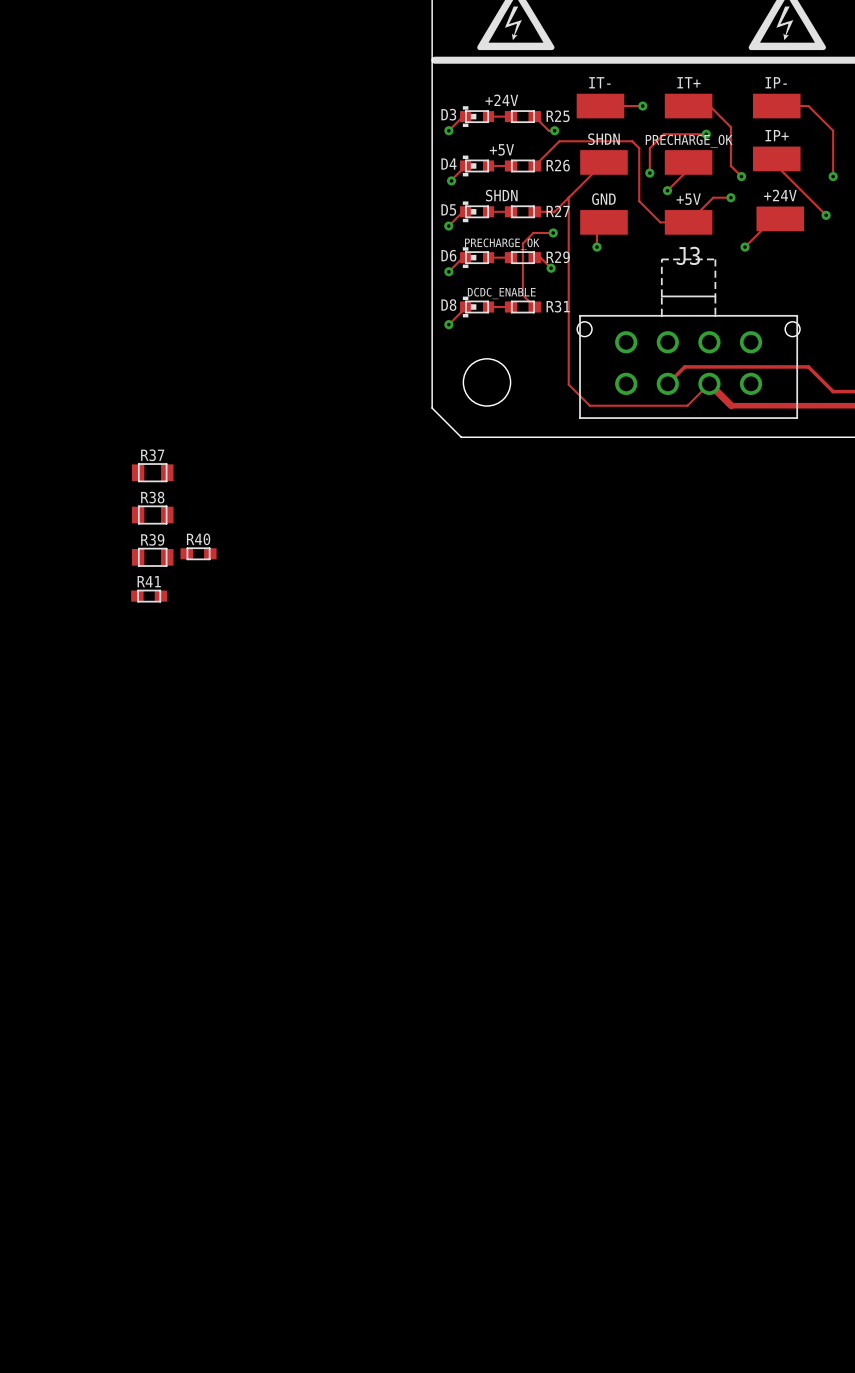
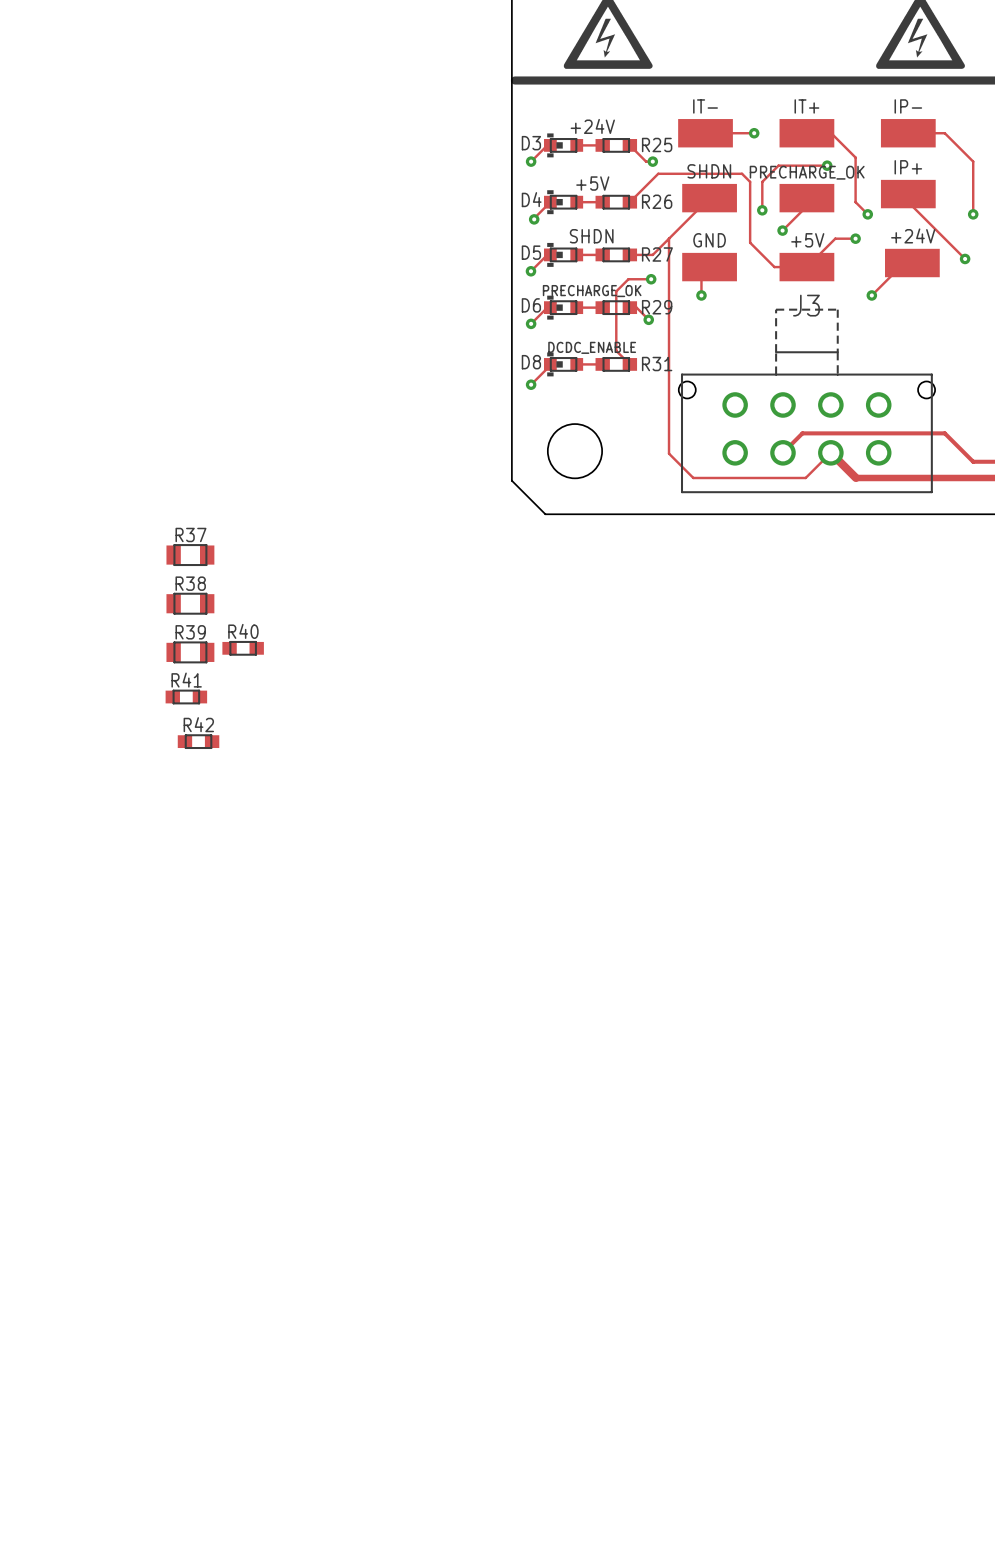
R42: none -> (198, 741)

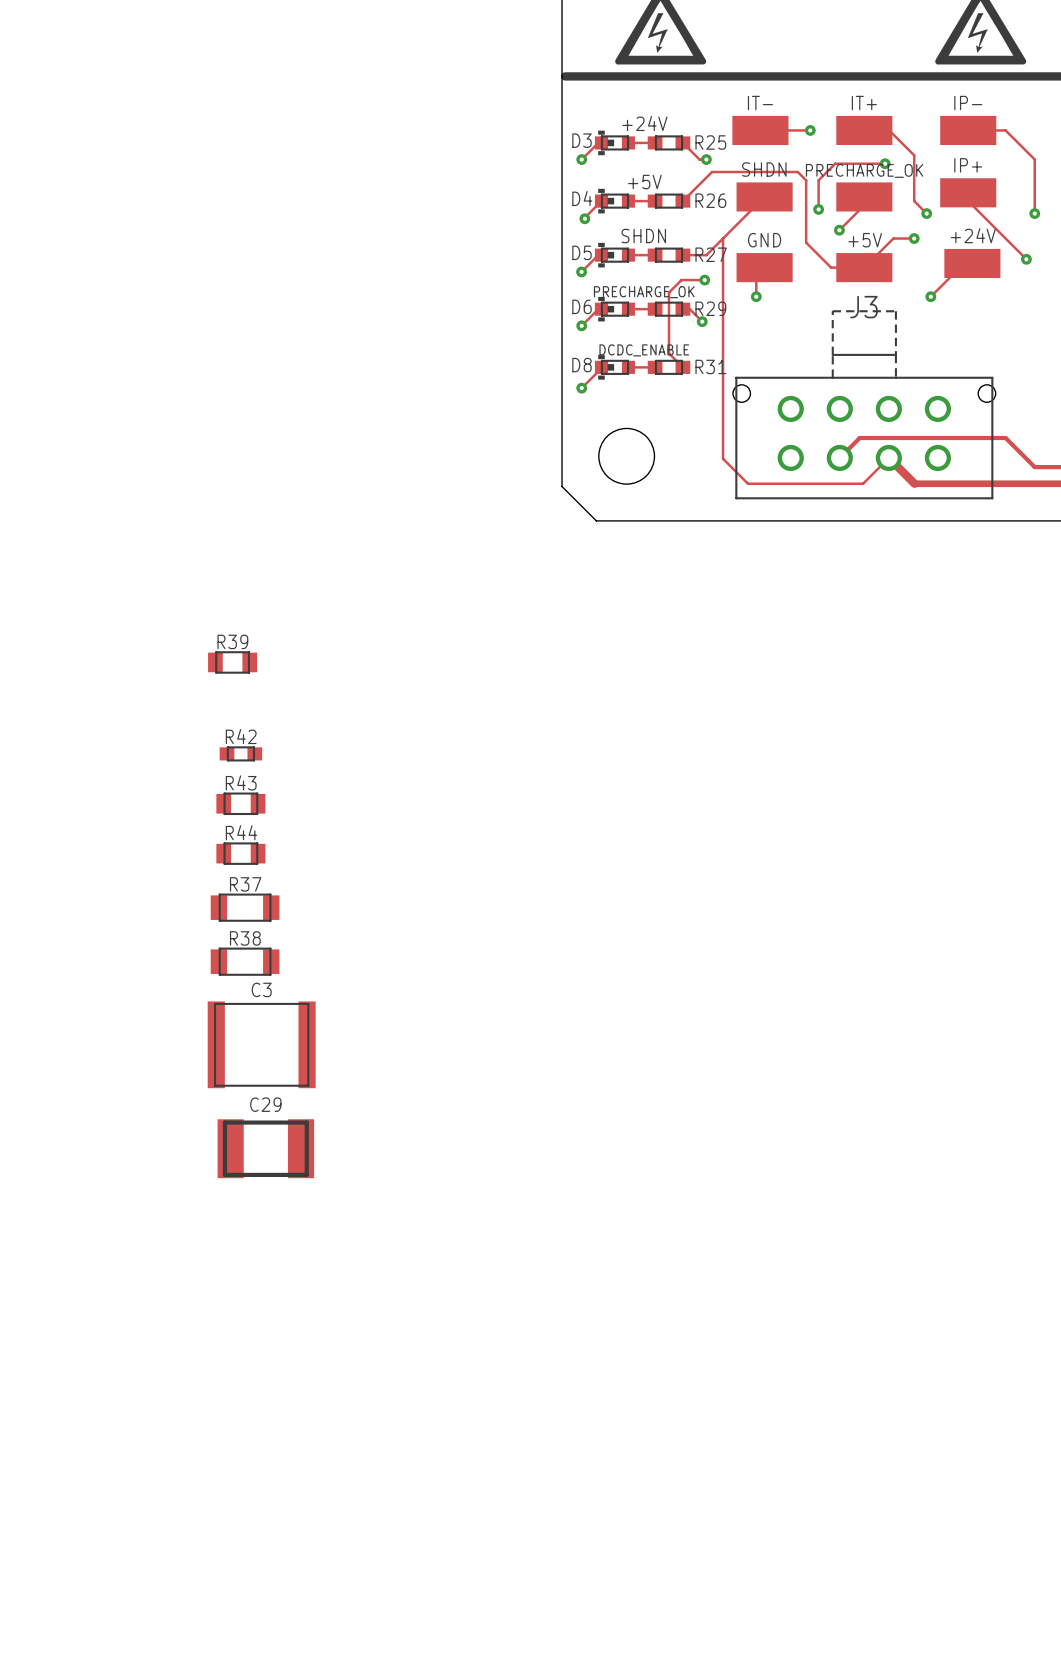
R37 footprint: [166, 544, 215, 567] -> [210, 893, 280, 922]
R38 footprint: [166, 592, 215, 615] -> [210, 947, 280, 976]
R40: (243, 648) -> none
R41: (186, 697) -> none
R43: none -> (240, 803)
R44: none -> (240, 853)
C3: none -> (261, 1044)
C29: none -> (265, 1148)

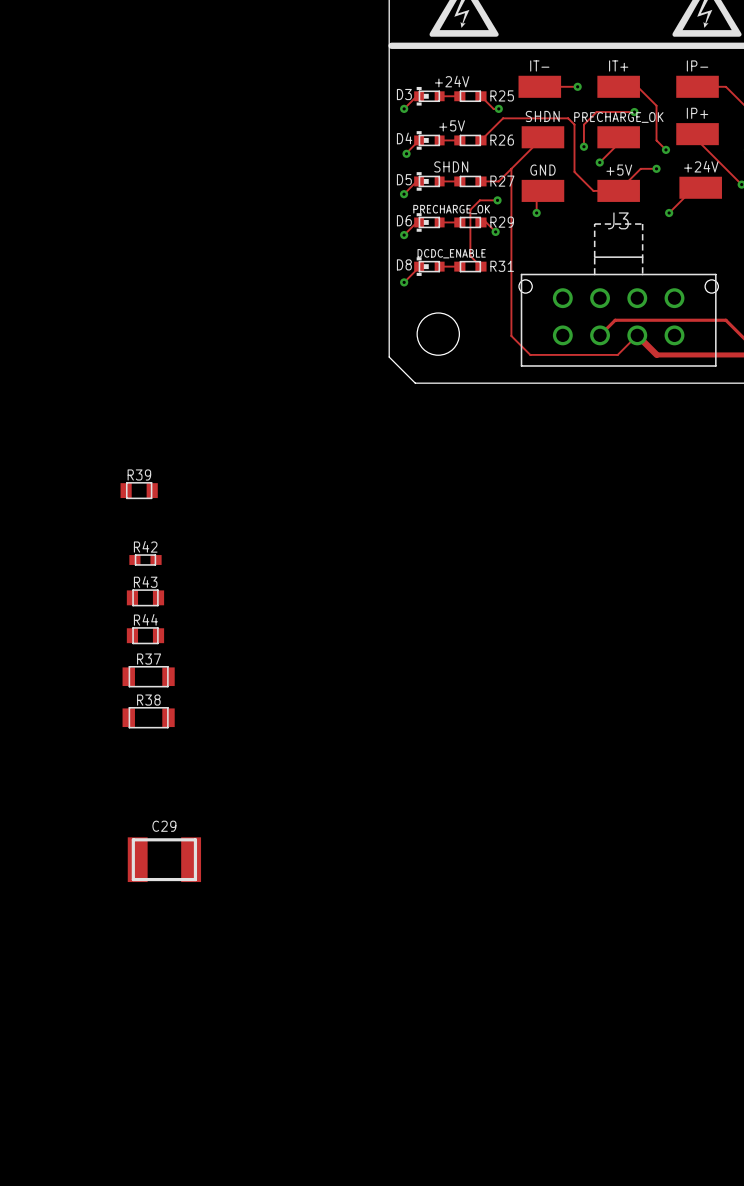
C3: (261, 1044) -> none

